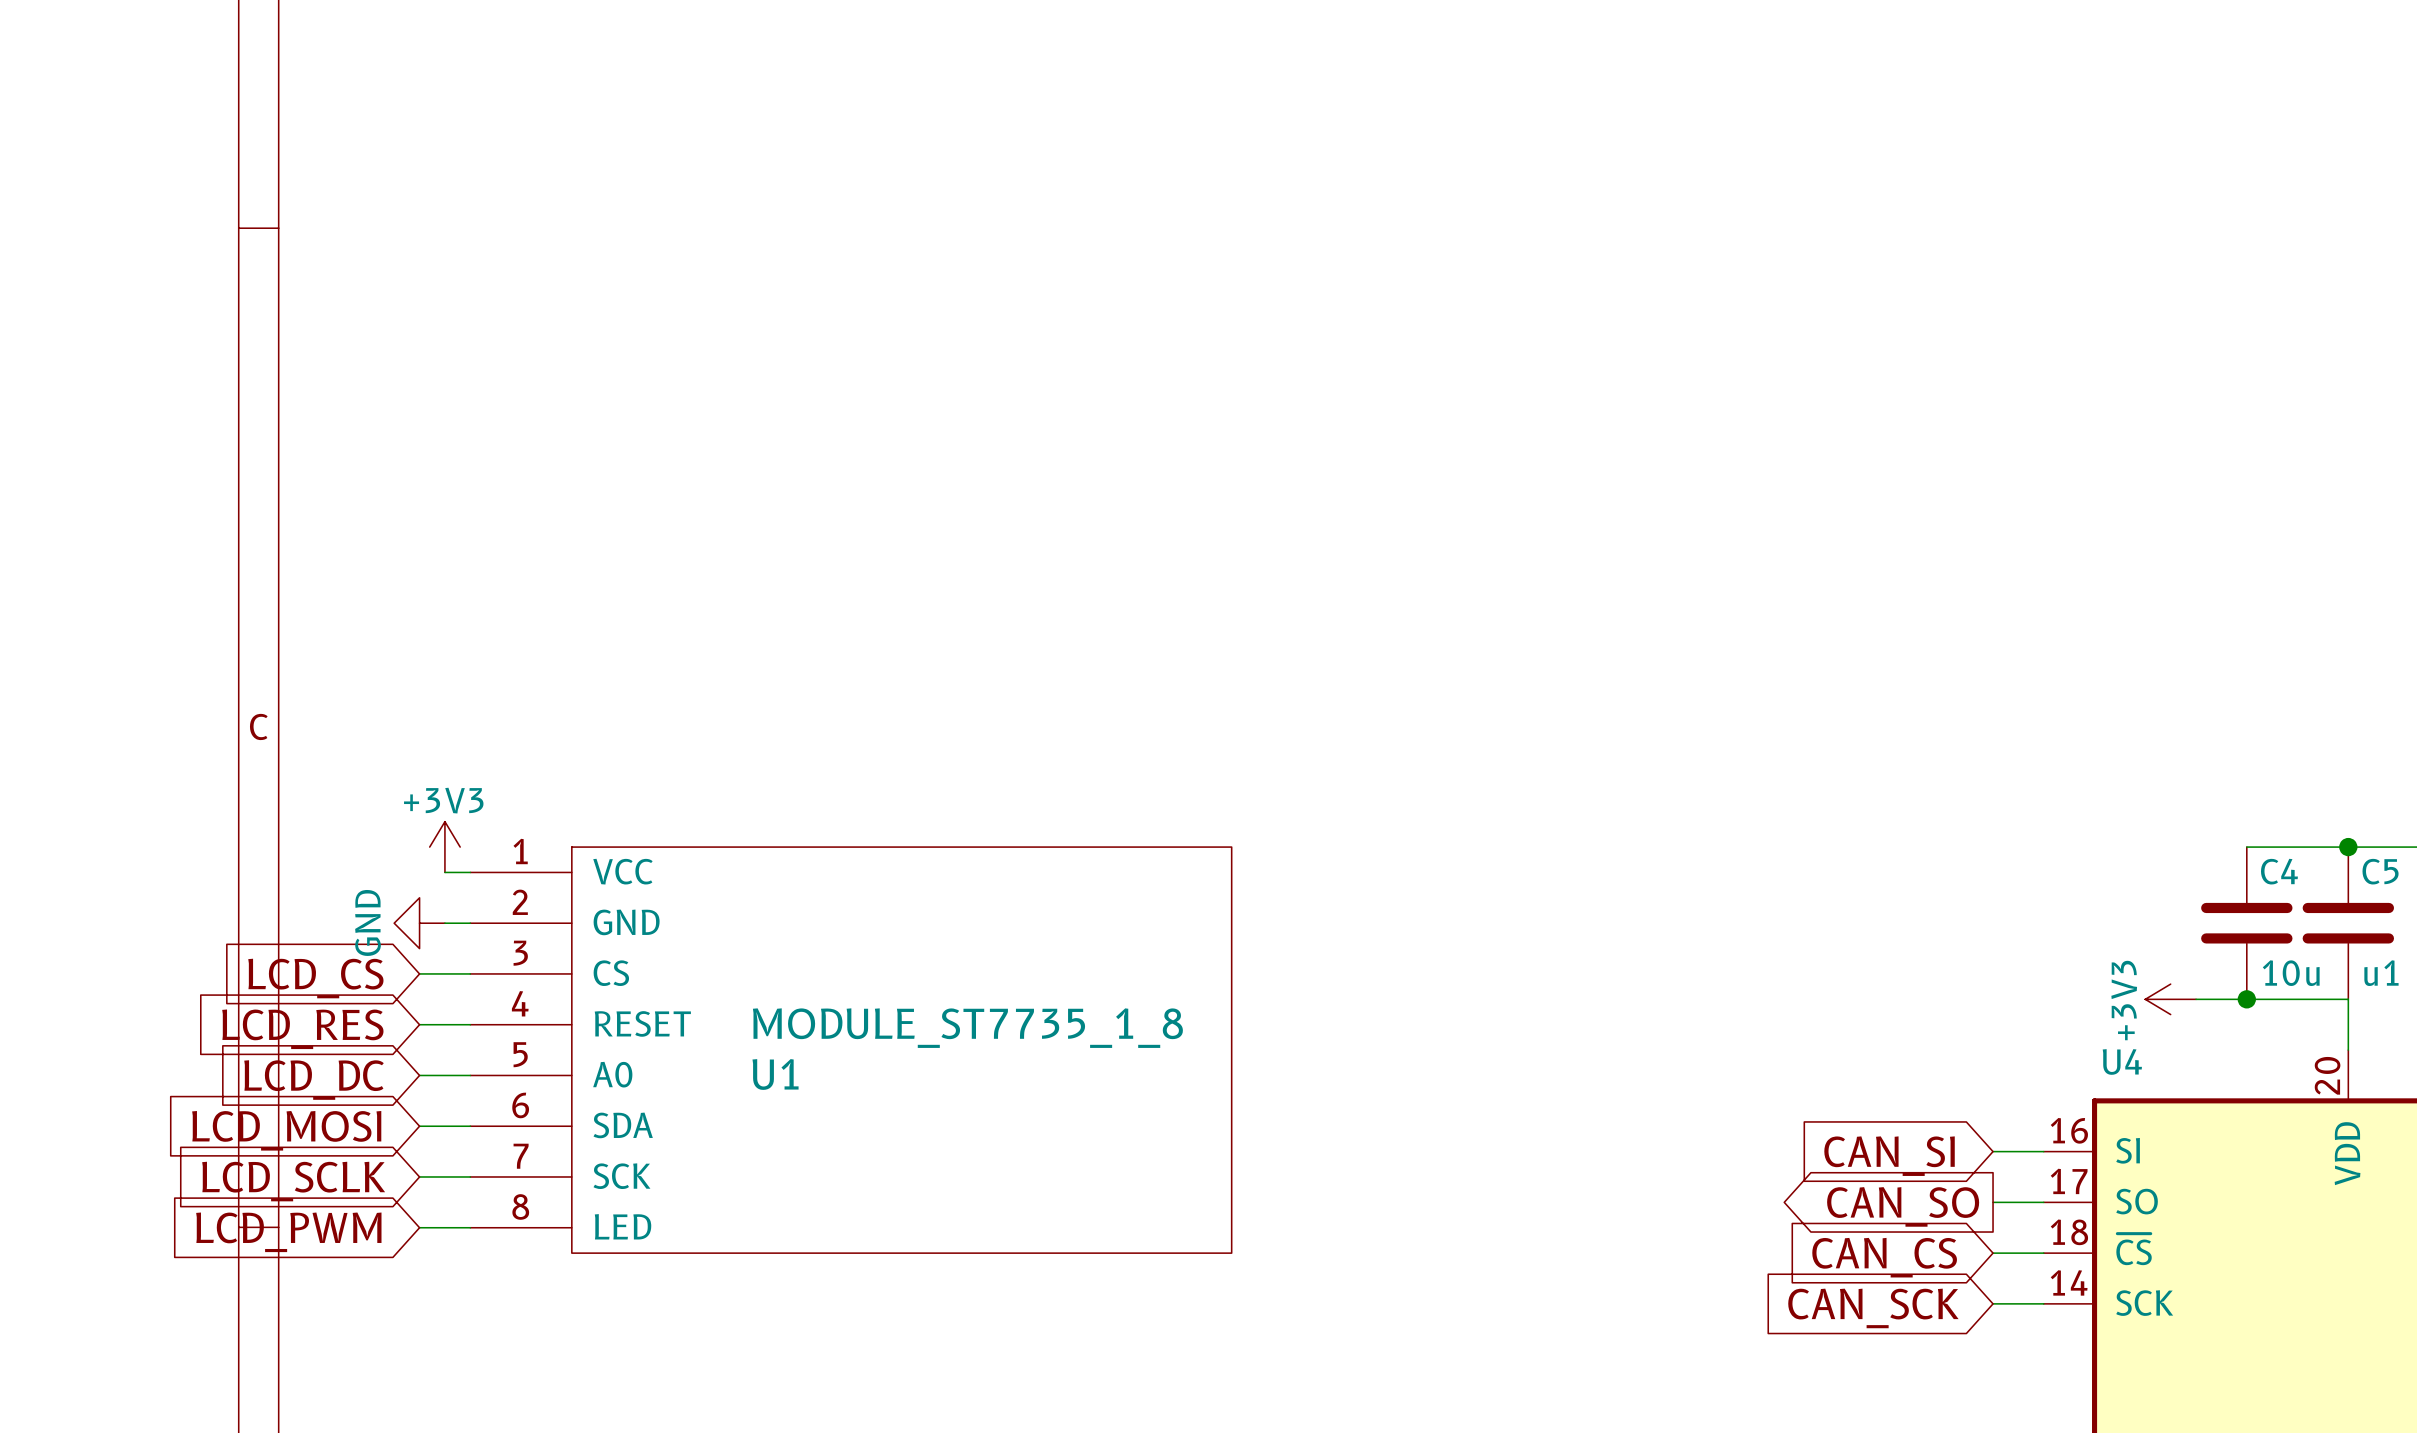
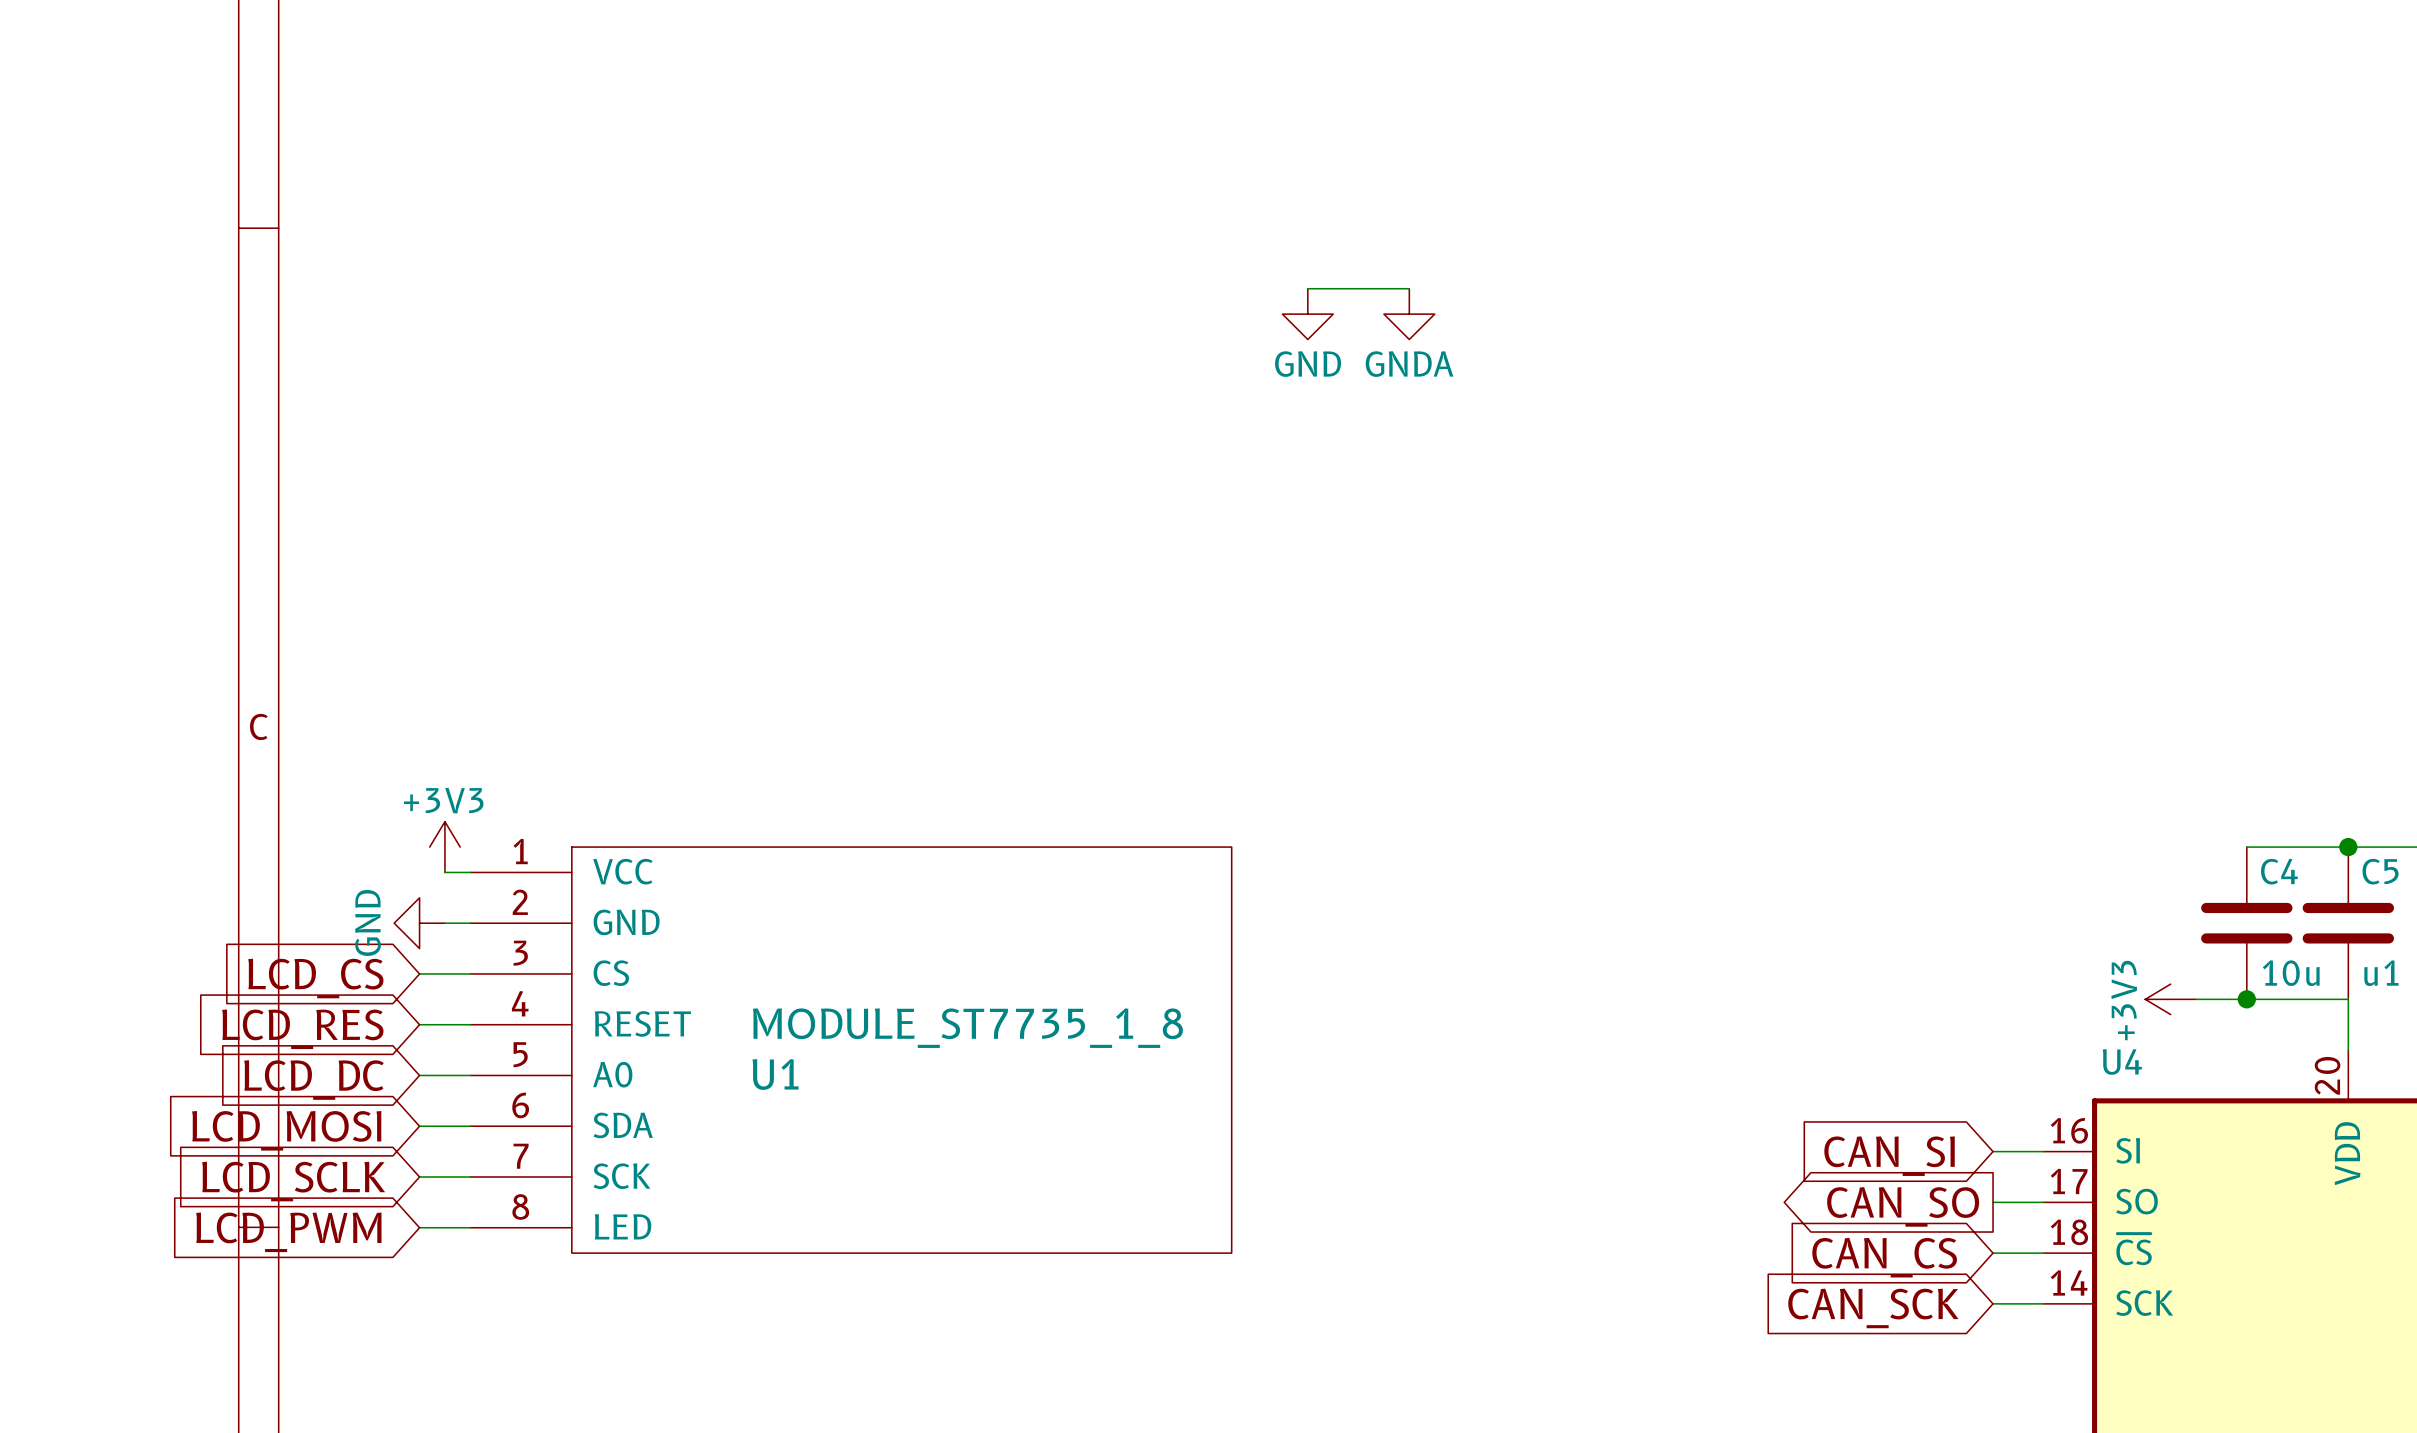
wire: none -> (1307, 288) (1409, 288)
power symbol: none -> GND (1307, 314)
power symbol: none -> GNDA (1409, 314)

